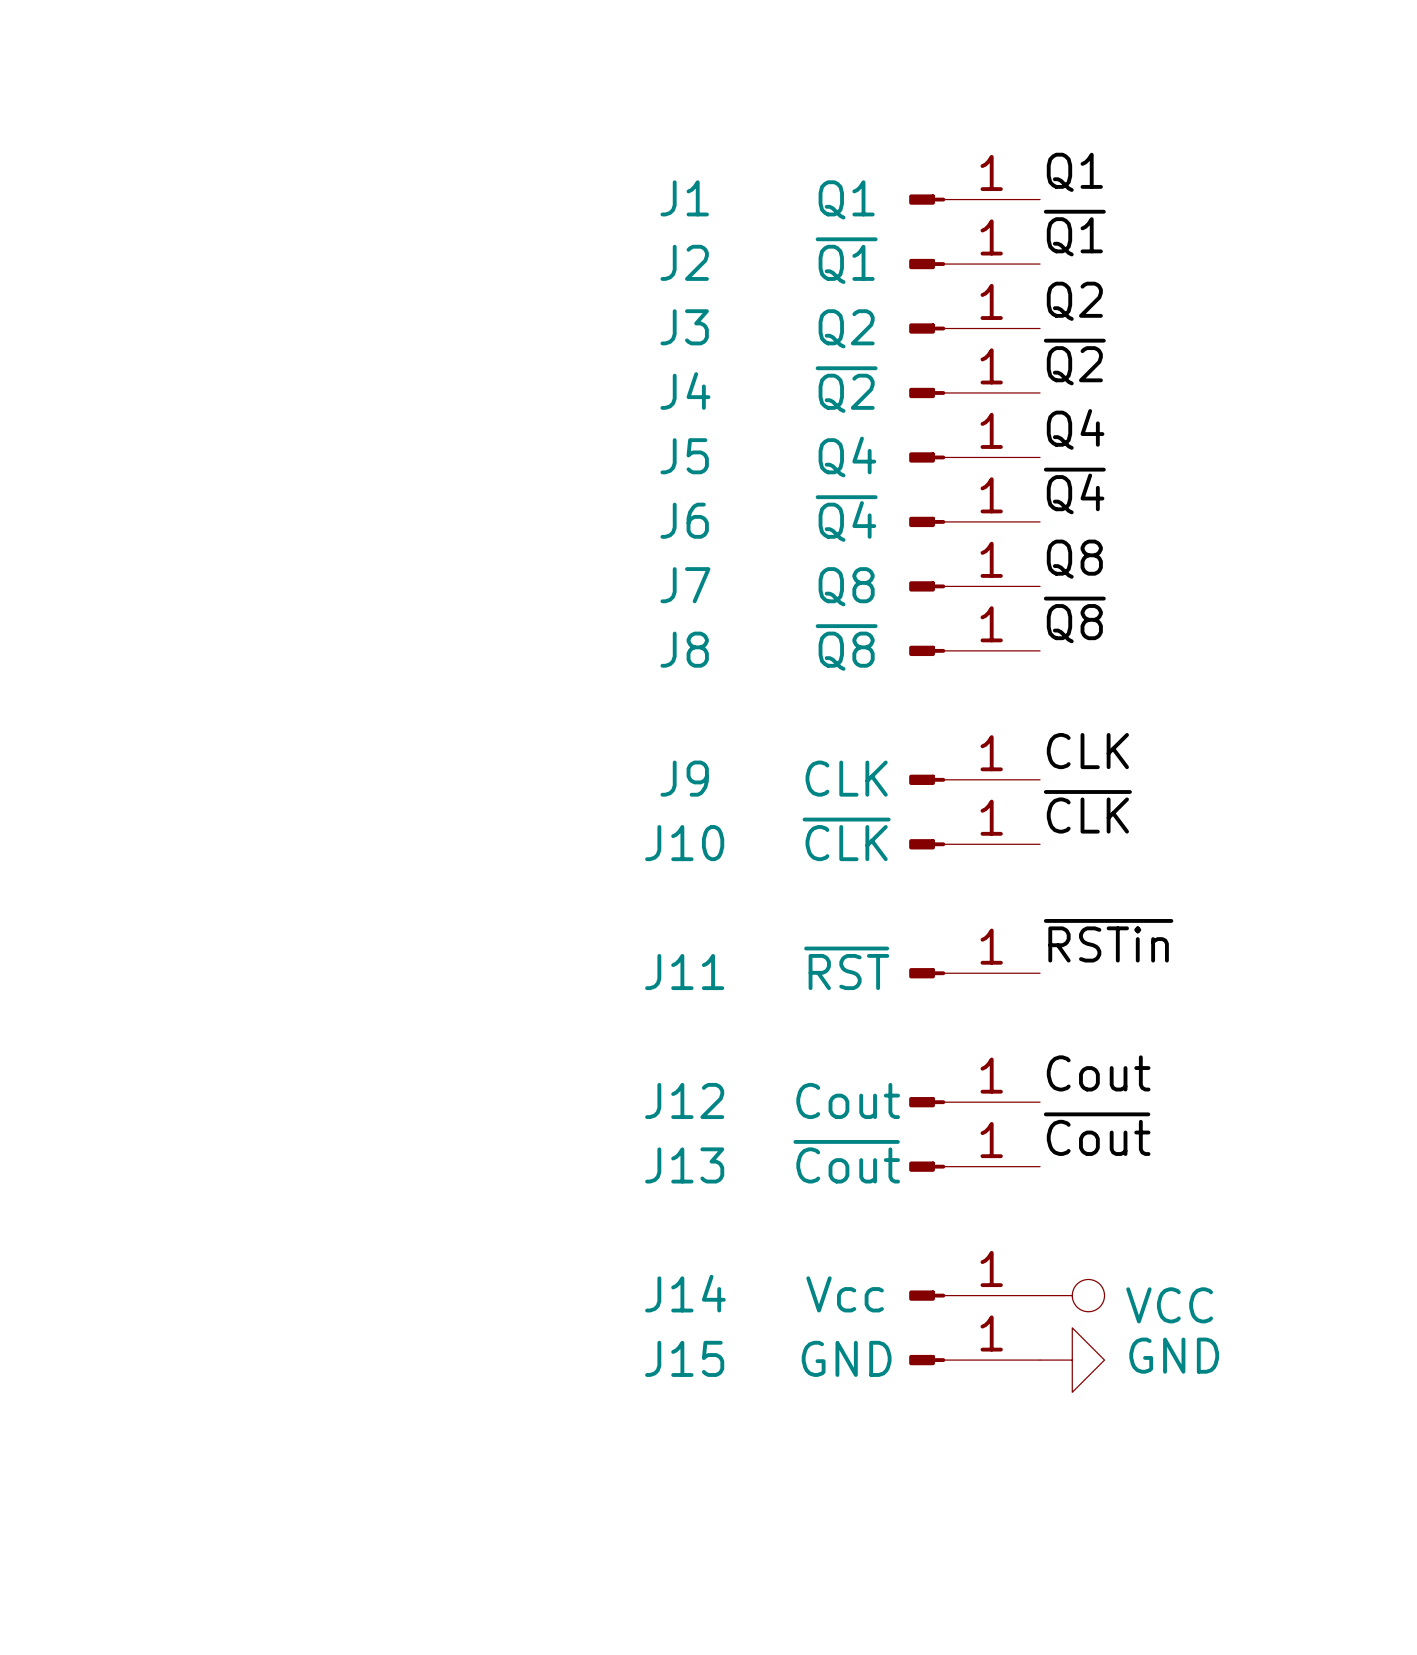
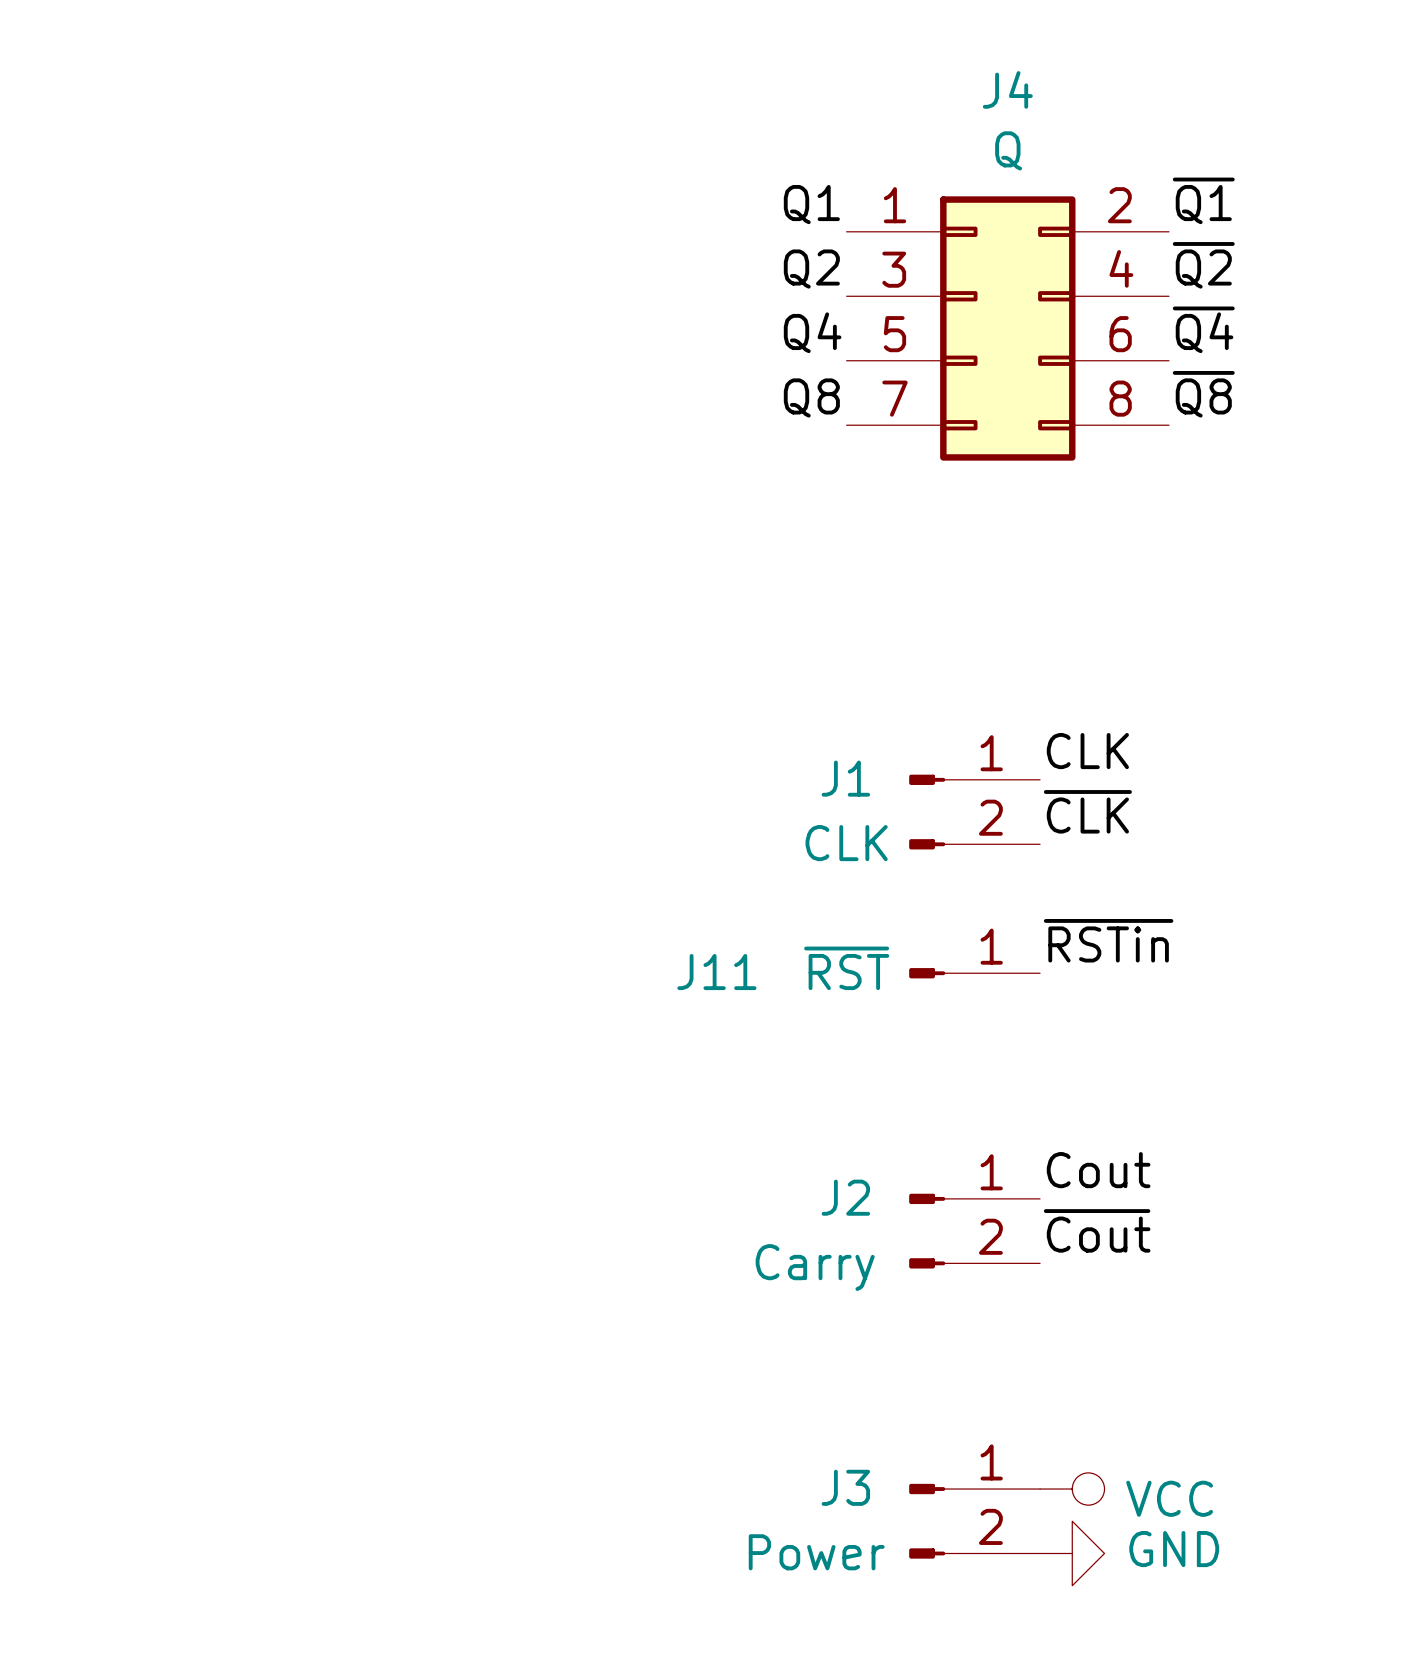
label position: Q1 (1074, 172) -> Q1 (811, 204)
J1 symbol: [909, 194, 1041, 205] -> [909, 774, 1041, 850]
J1 name position: J1 (684, 198) -> J1 (845, 778)
J1 value: Q1 (846, 199) -> CLK (846, 843)
label position: ~{Q1} (1074, 233) -> ~{Q1} (1203, 200)
J2 symbol: [909, 258, 1041, 270] -> [909, 1193, 1041, 1269]
J2 value: ~{Q1} (846, 260) -> Carry (815, 1267)
J2 name position: J2 (684, 262) -> J2 (845, 1197)
label position: Q2 (1074, 301) -> Q2 (811, 269)
J3 symbol: [909, 323, 1041, 334] -> [909, 1483, 1041, 1559]
J3 name position: J3 (684, 327) -> J3 (845, 1487)
J3 value: Q2 (846, 328) -> Power (816, 1552)
label position: ~{Q2} (1074, 362) -> ~{Q2} (1203, 265)
J4 symbol: [909, 387, 1041, 399] -> [846, 196, 1169, 461]
J4 value: ~{Q2} (846, 389) -> Q (1008, 150)
J4 name position: J4 (685, 391) -> J4 (1007, 89)
label position: Q4 (1075, 429) -> Q4 (812, 332)
J5: Q4 (974, 457) -> none
label position: ~{Q4} (1074, 490) -> ~{Q4} (1203, 329)
J6: ~{Q4} (974, 521) -> none
label position: Q8 (1074, 559) -> Q8 (811, 397)
J7: Q8 (974, 586) -> none
label position: ~{Q8} (1074, 619) -> ~{Q8} (1203, 394)
J8: ~{Q8} (974, 650) -> none
J9: CLK (974, 779) -> none
J10: ~{CLK} (974, 844) -> none
J11 name position: J11 (684, 972) -> J11 (716, 972)
label position: Cout (1098, 1073) -> Cout (1098, 1170)
J12: Cout (974, 1102) -> none
label position: ~{Cout} (1097, 1134) -> ~{Cout} (1097, 1230)
J13: ~{Cout} (974, 1166) -> none
J14: Vcc (974, 1295) -> none
power symbol position: VCC (1072, 1295) -> VCC (1072, 1489)
J15: GND (974, 1360) -> none
power symbol position: GND (1072, 1360) -> GND (1072, 1553)

